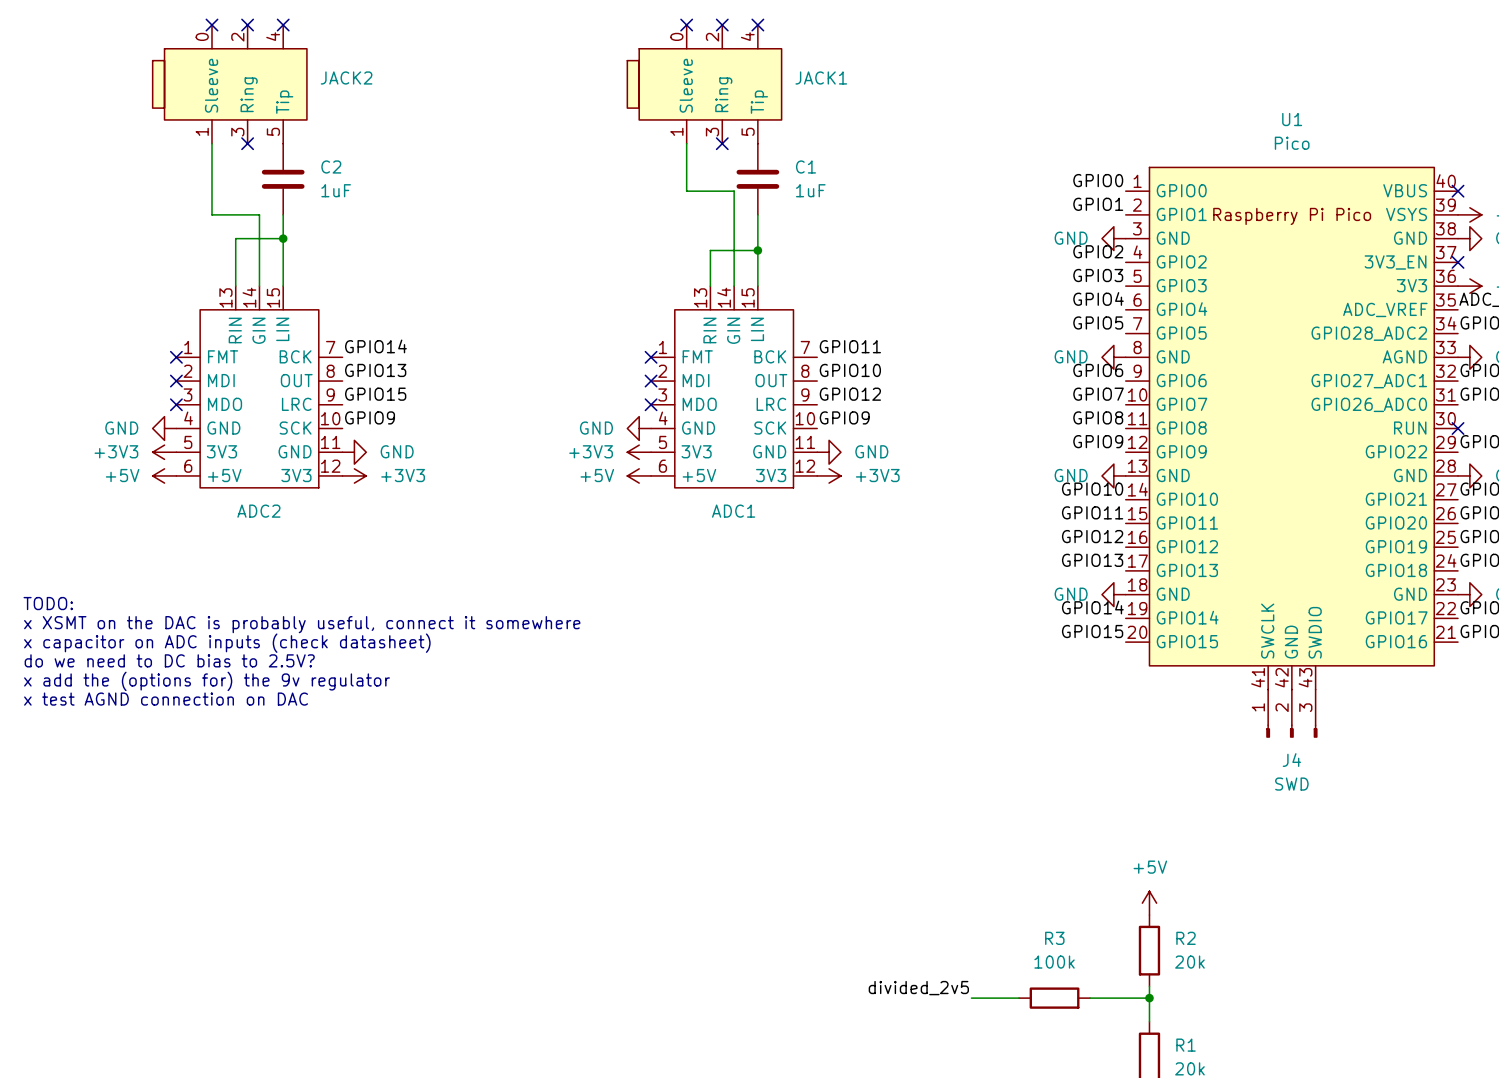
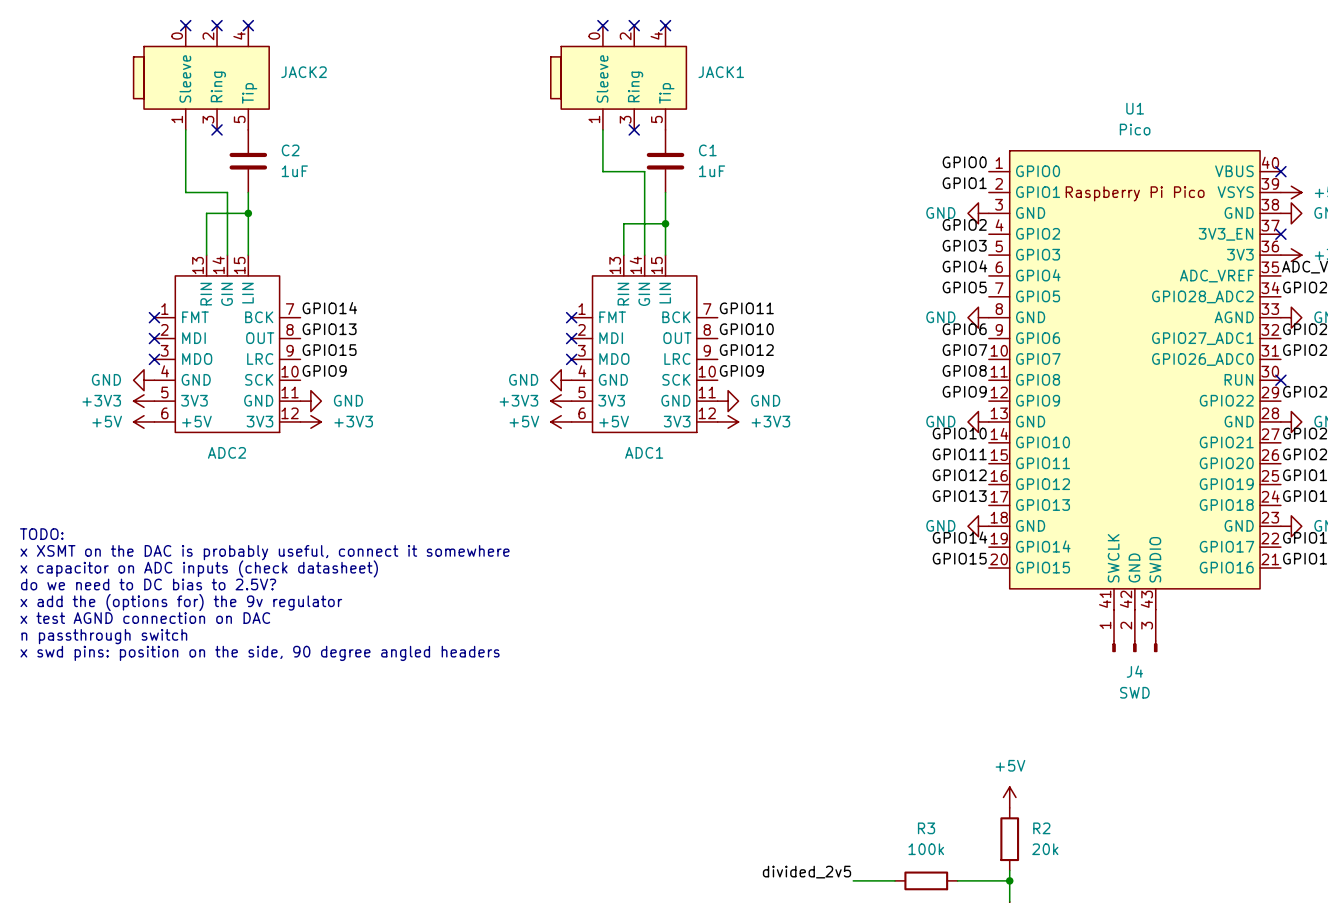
text: none -> n passthrough switch (104, 636)
text: none -> x swd pins: position on the side, 90 degree angled headers (260, 653)

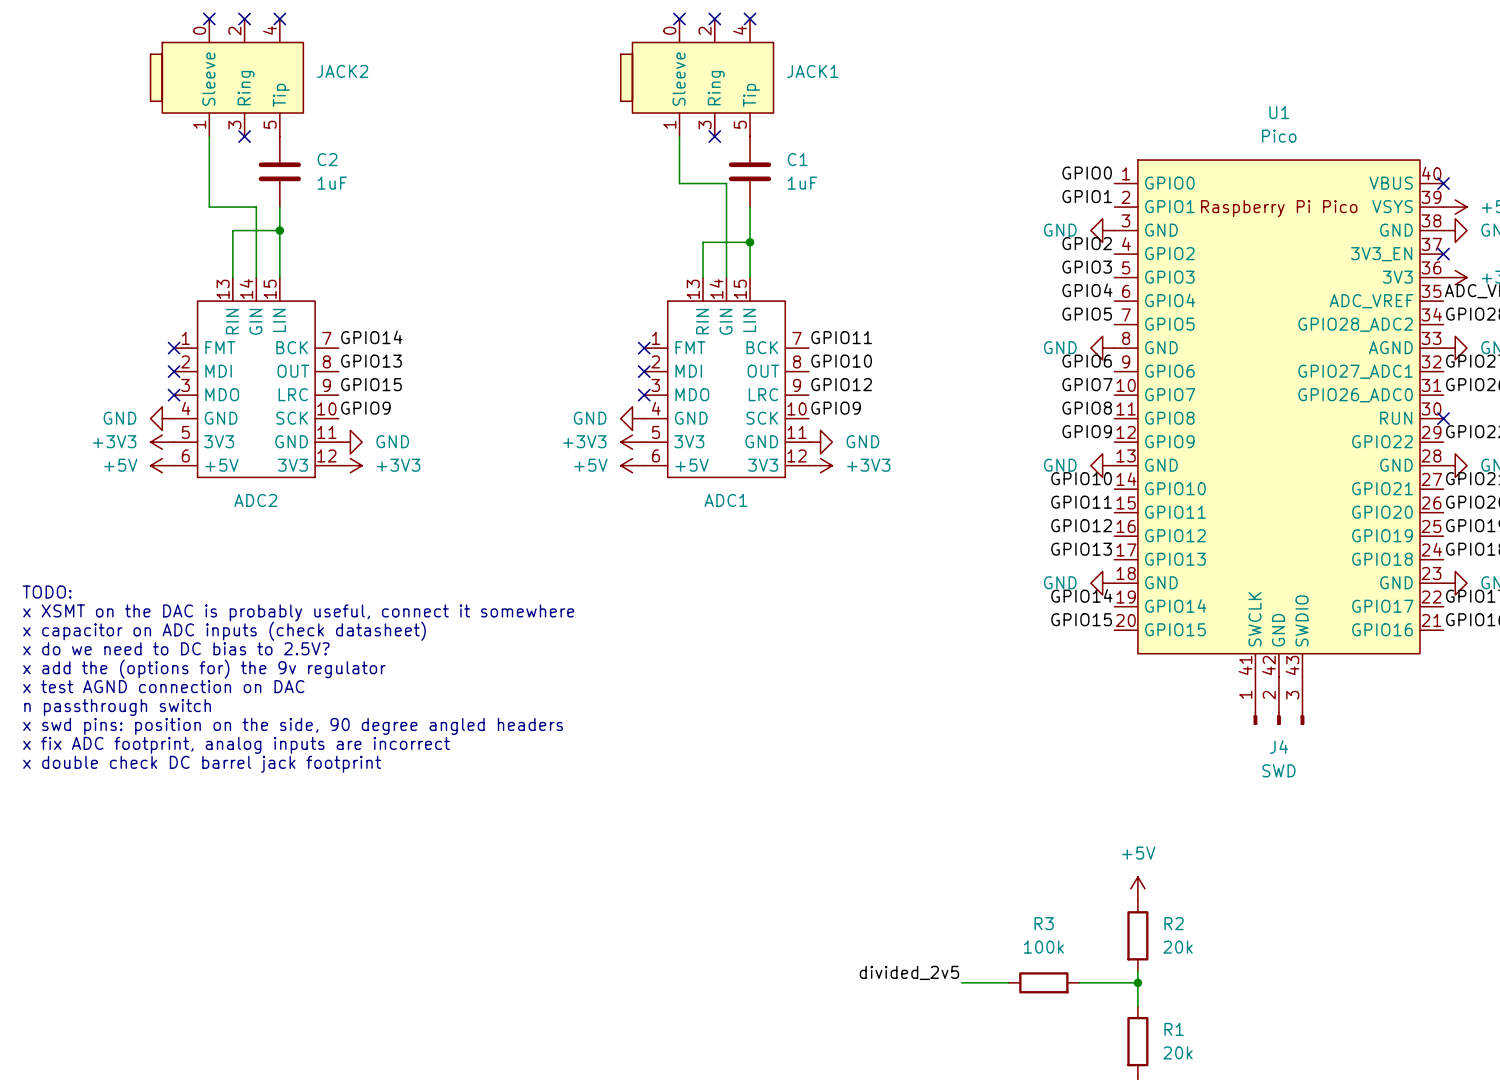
text: do we need to DC bias to 2.5V? (148, 584) -> x do we need to DC bias to 2.5V? (176, 648)
text: none -> x fix ADC footprint, analog inputs are incorrect (236, 745)
text: none -> x double check DC barrel jack footprint (202, 764)

